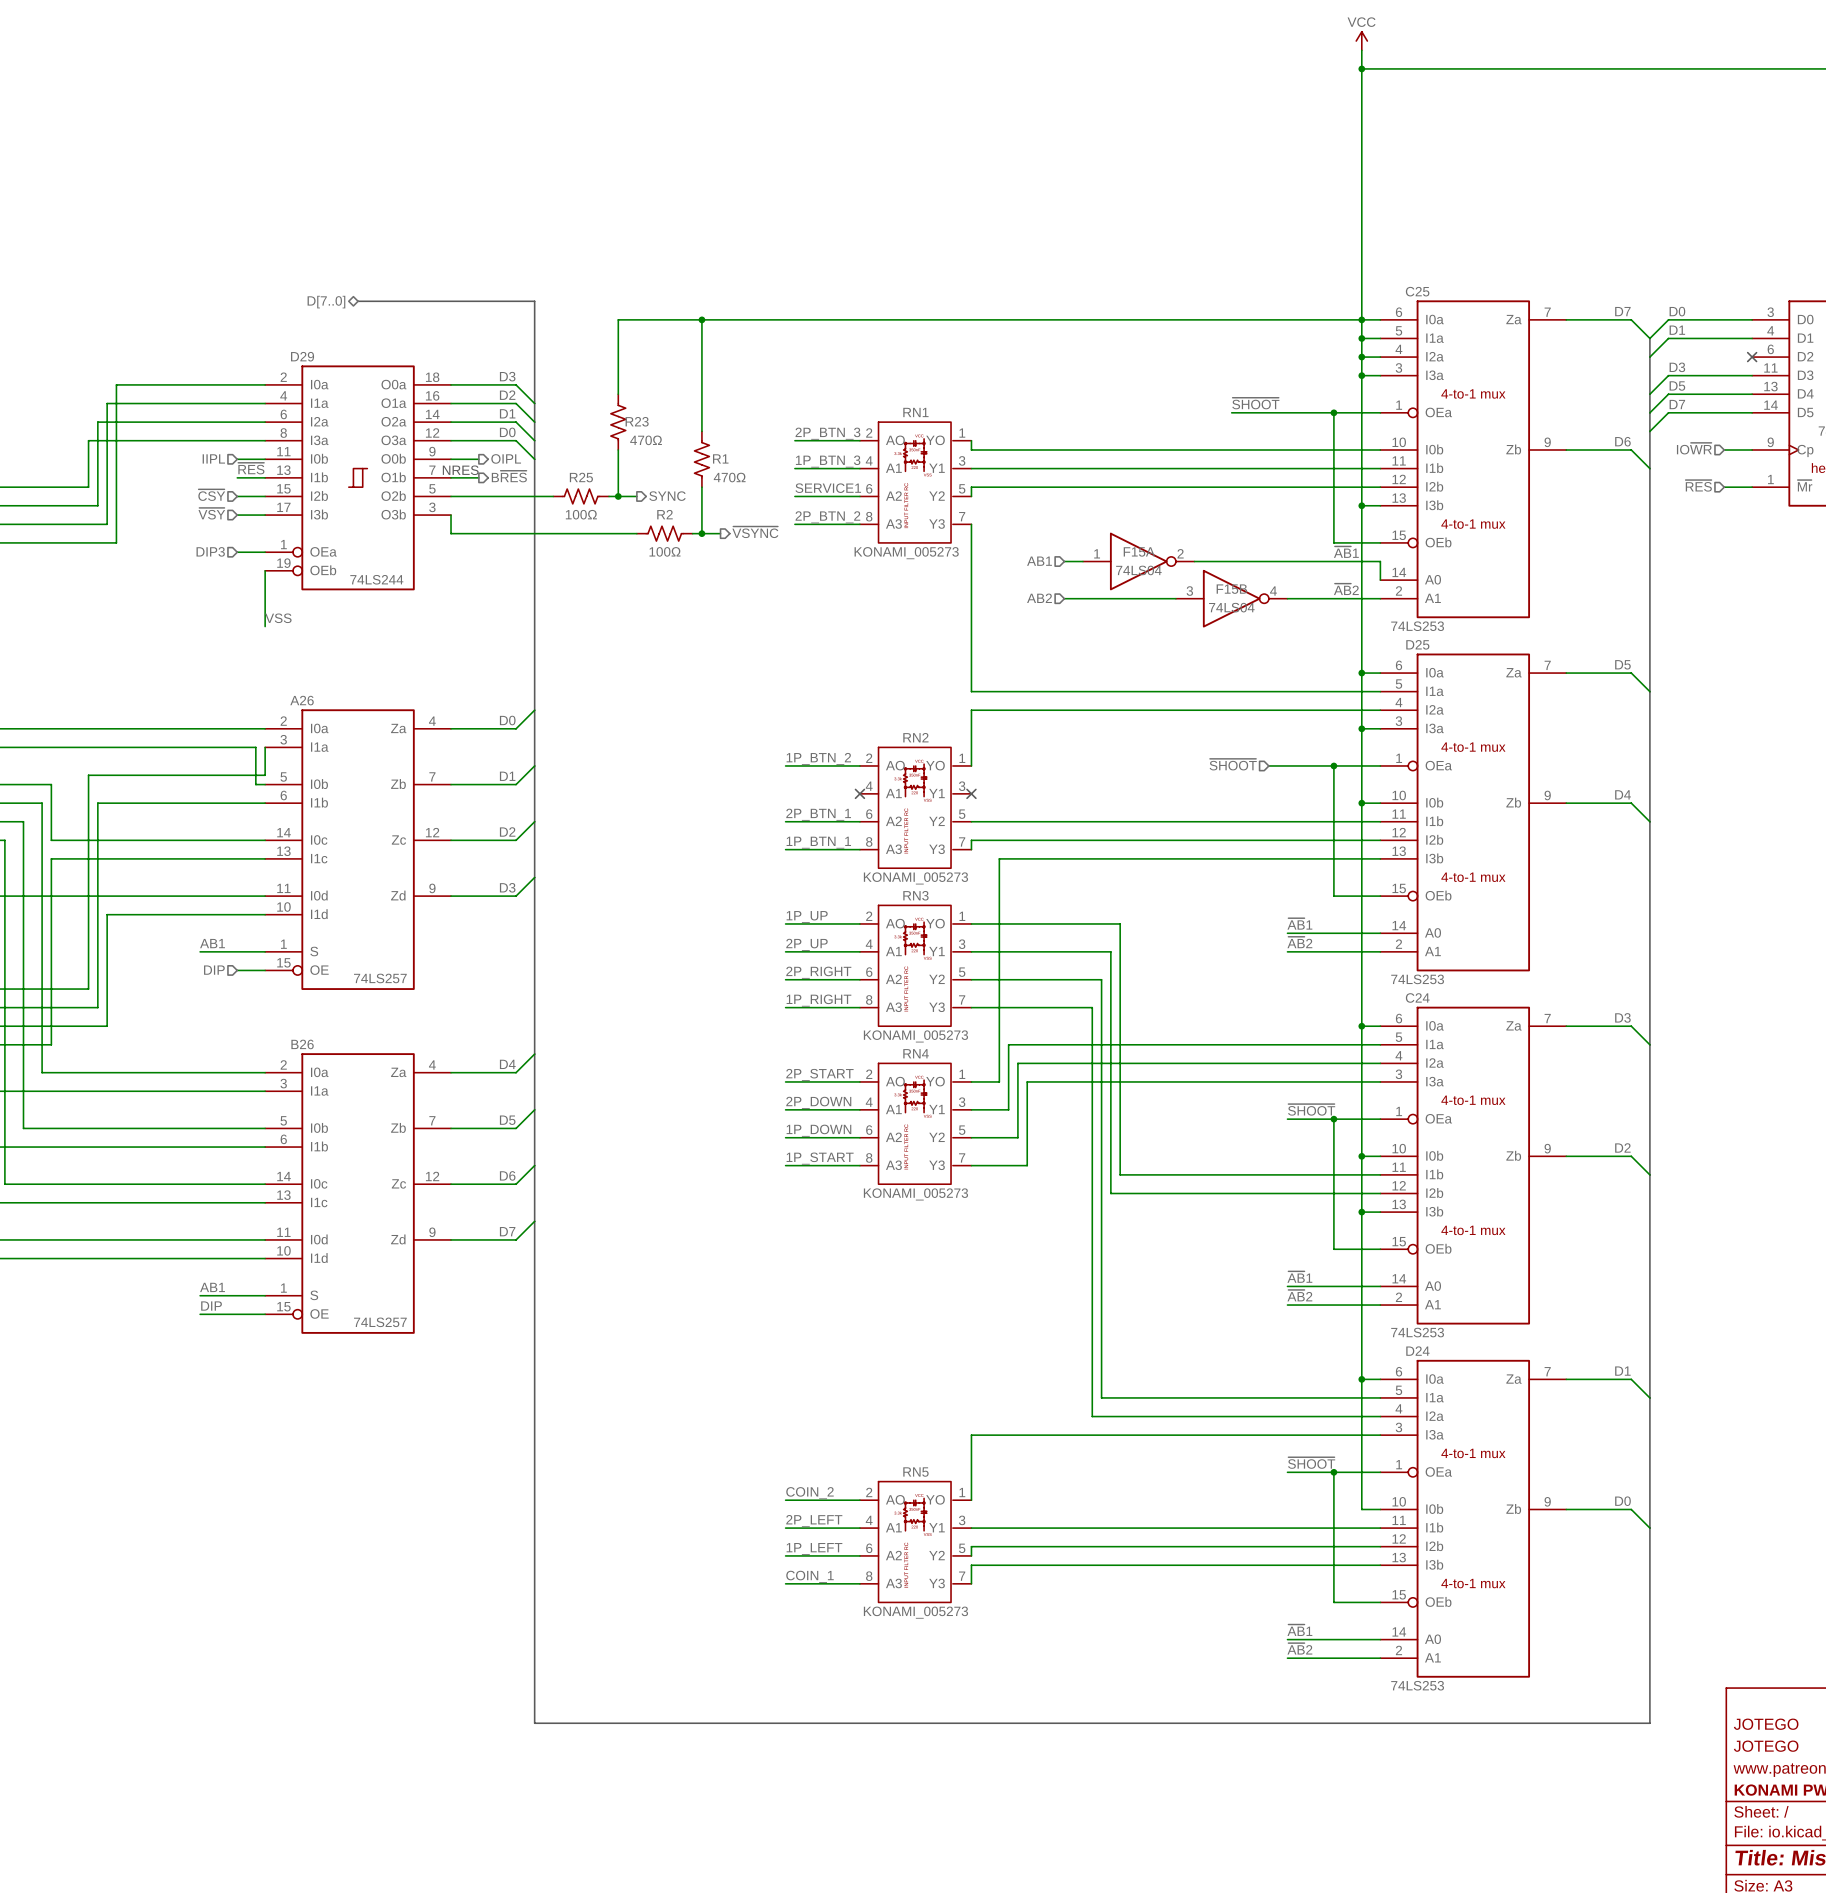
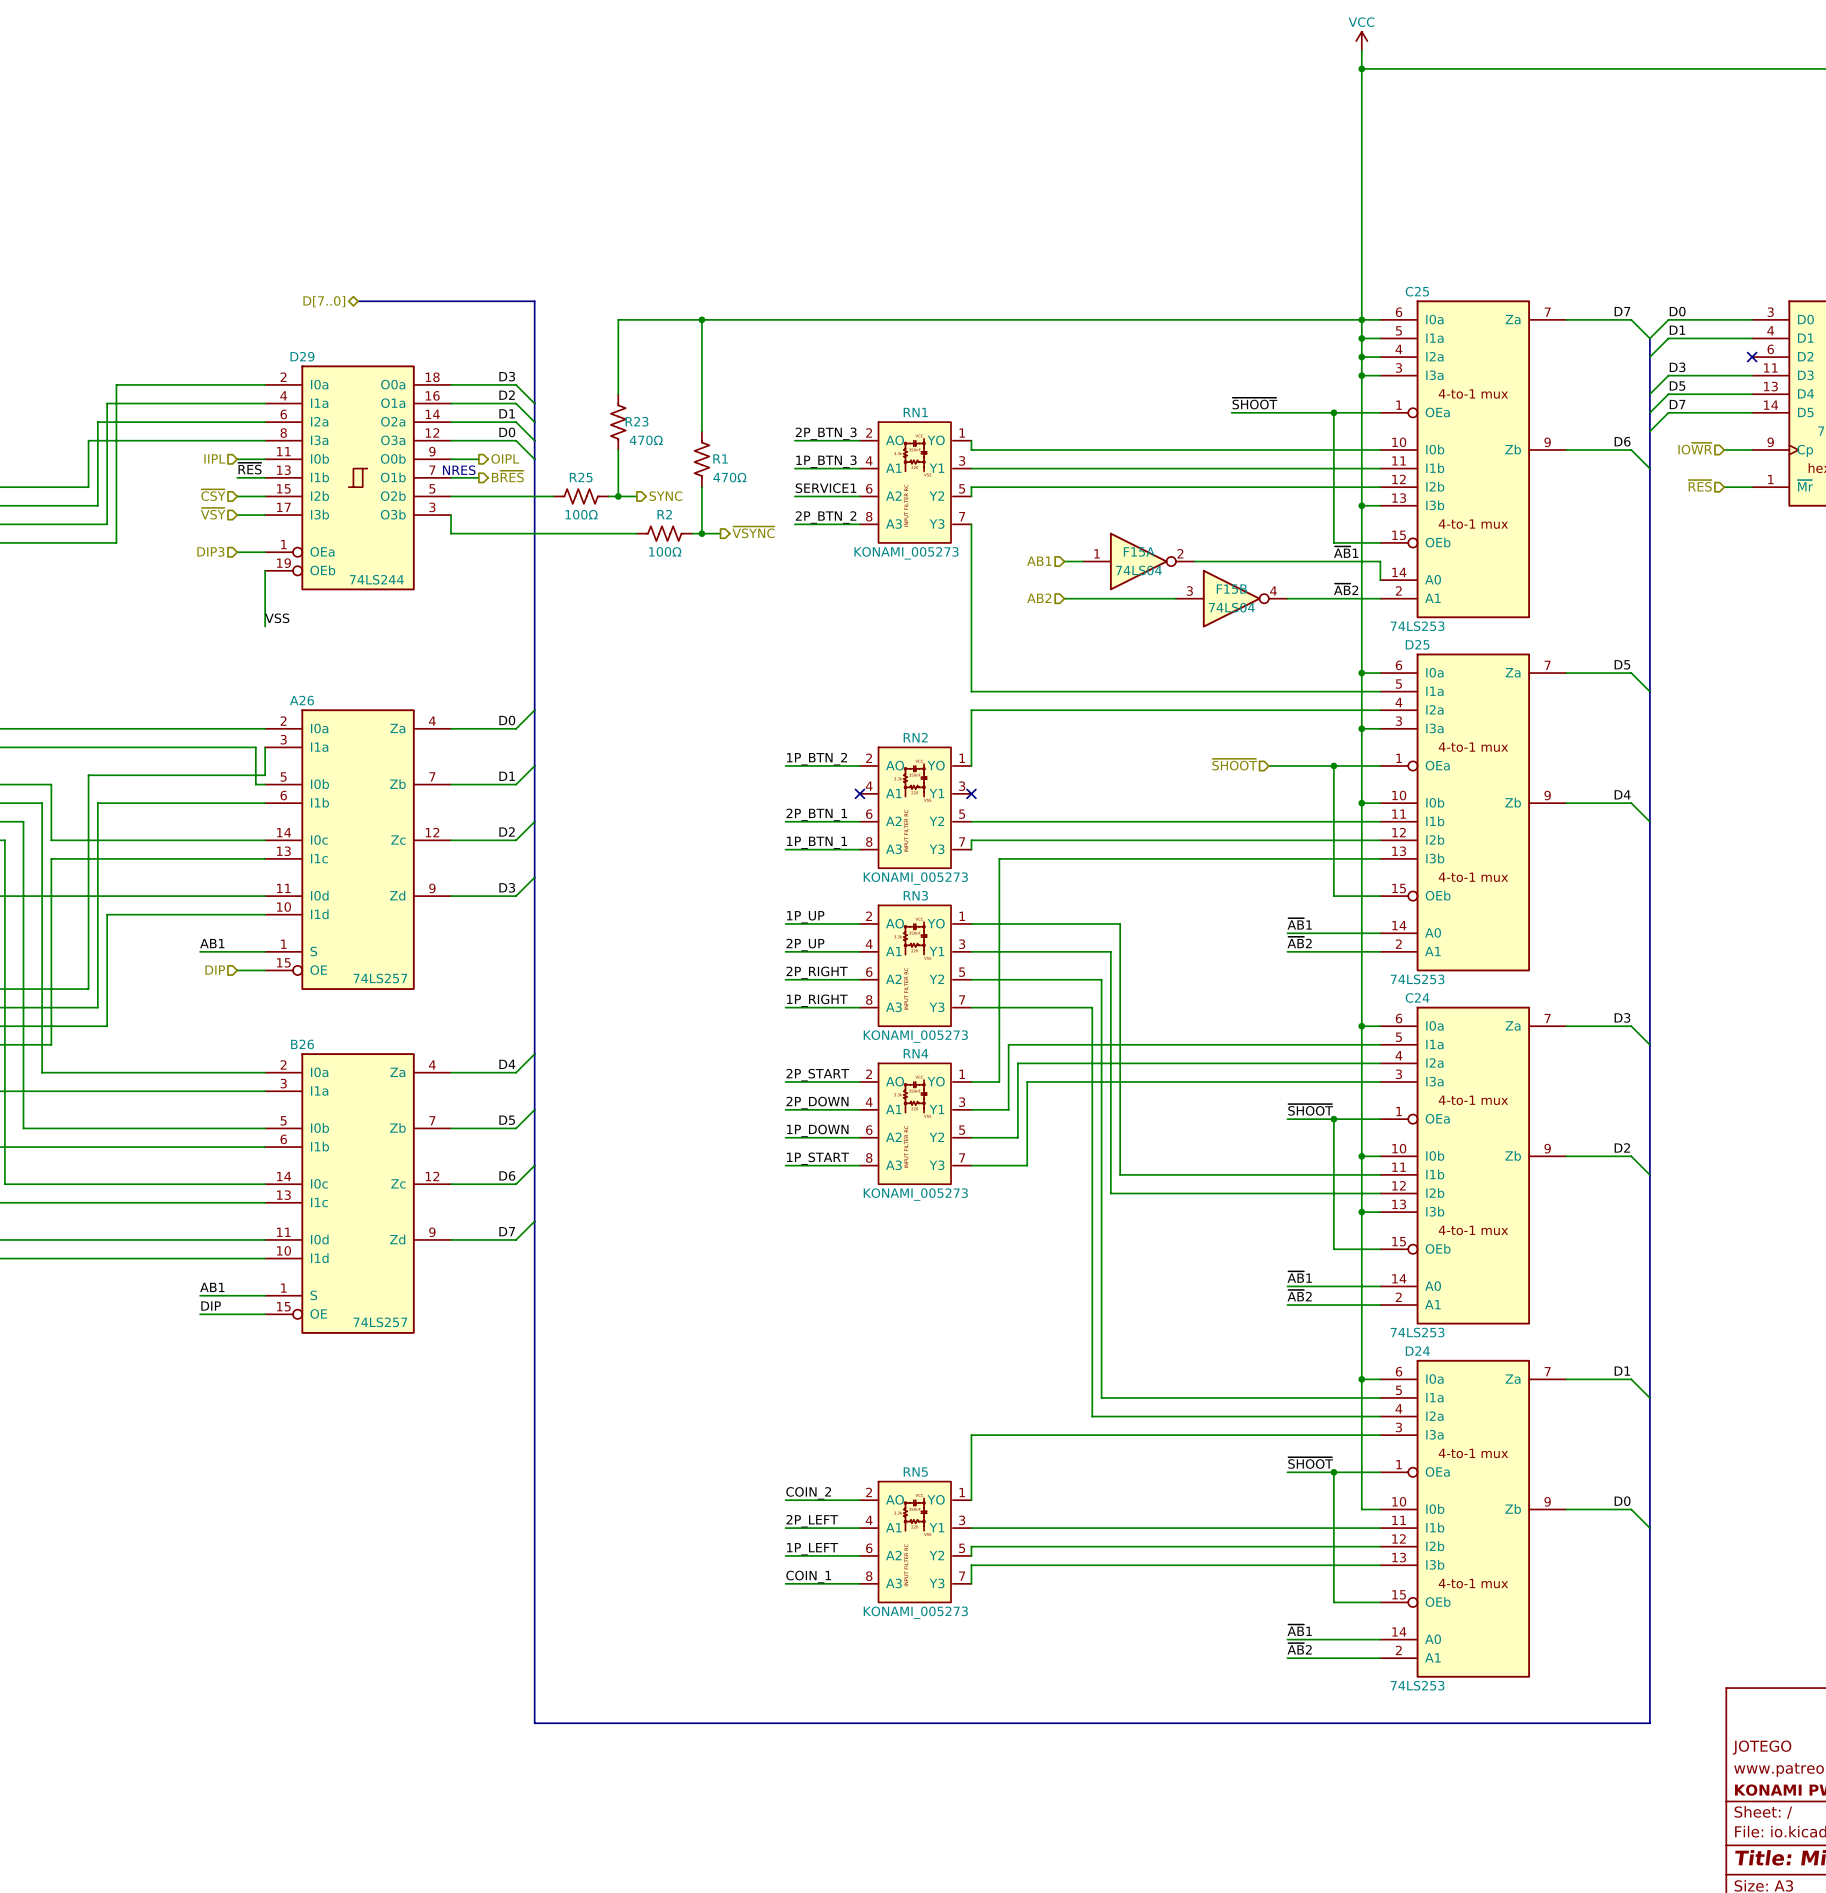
title block: JOTEGO (1766, 1724) -> none

